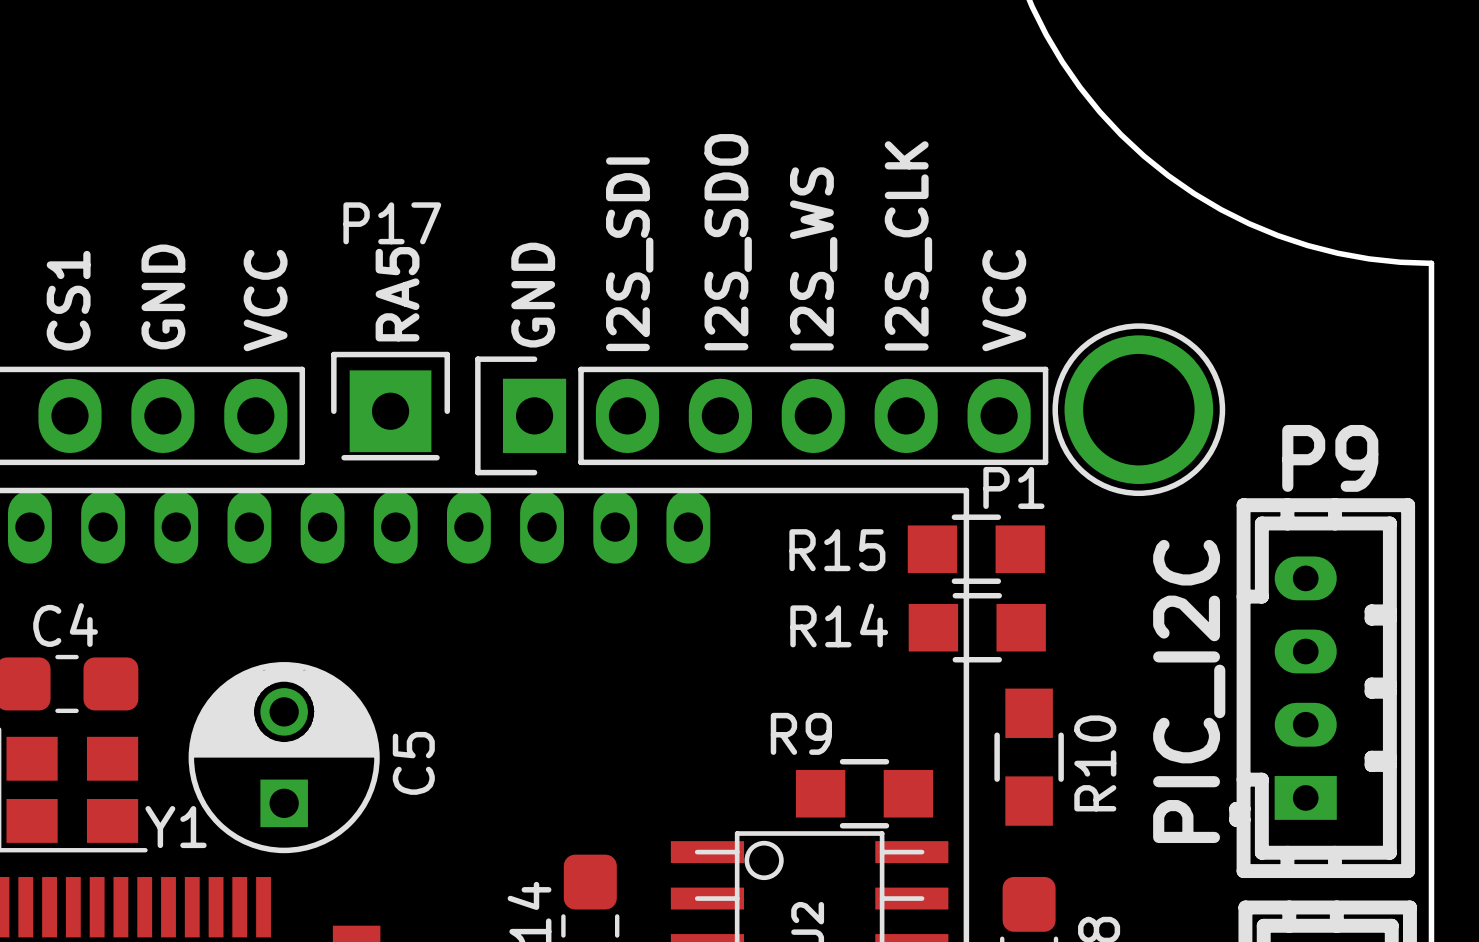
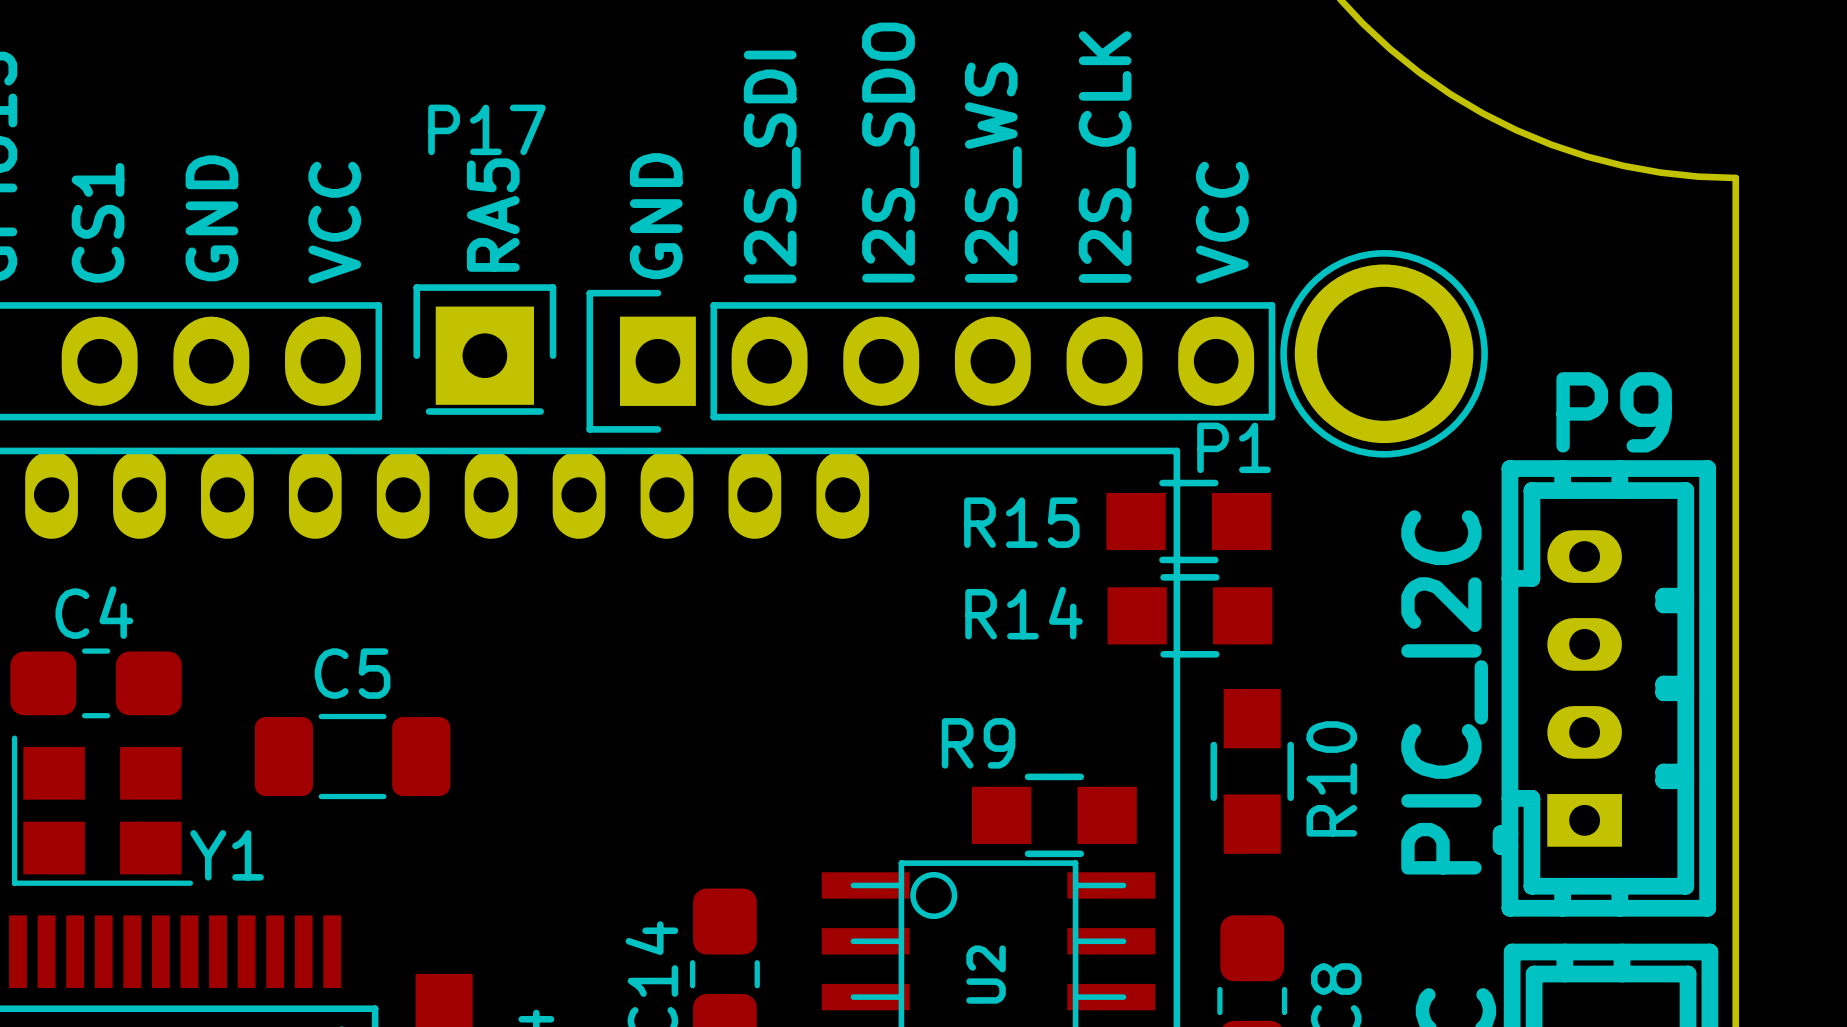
C5 footprint: [188, 662, 380, 854] -> [254, 713, 451, 800]
C5 name position: C5 (413, 763) -> C5 (352, 673)

